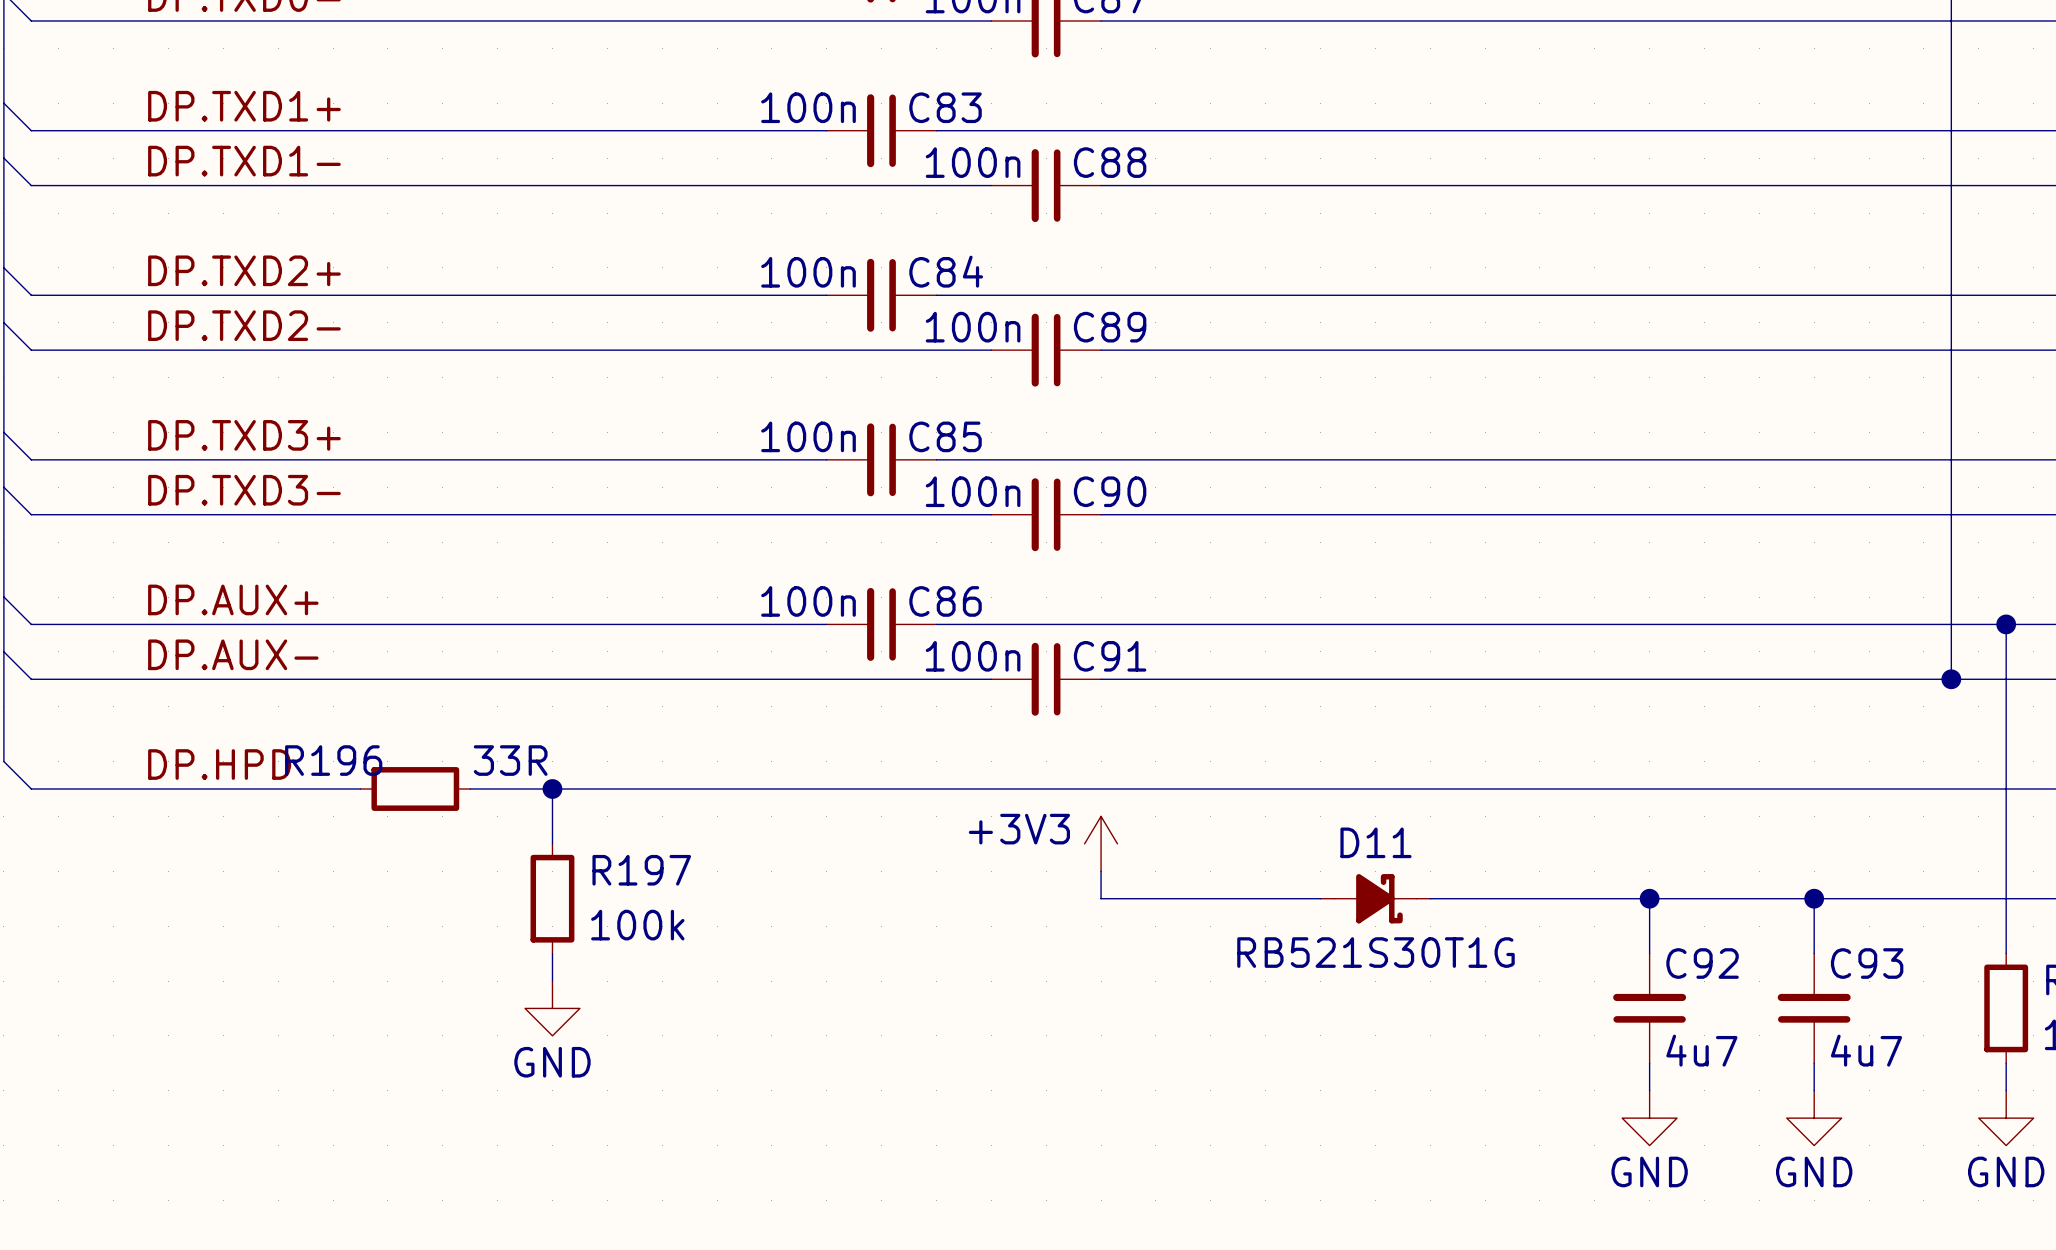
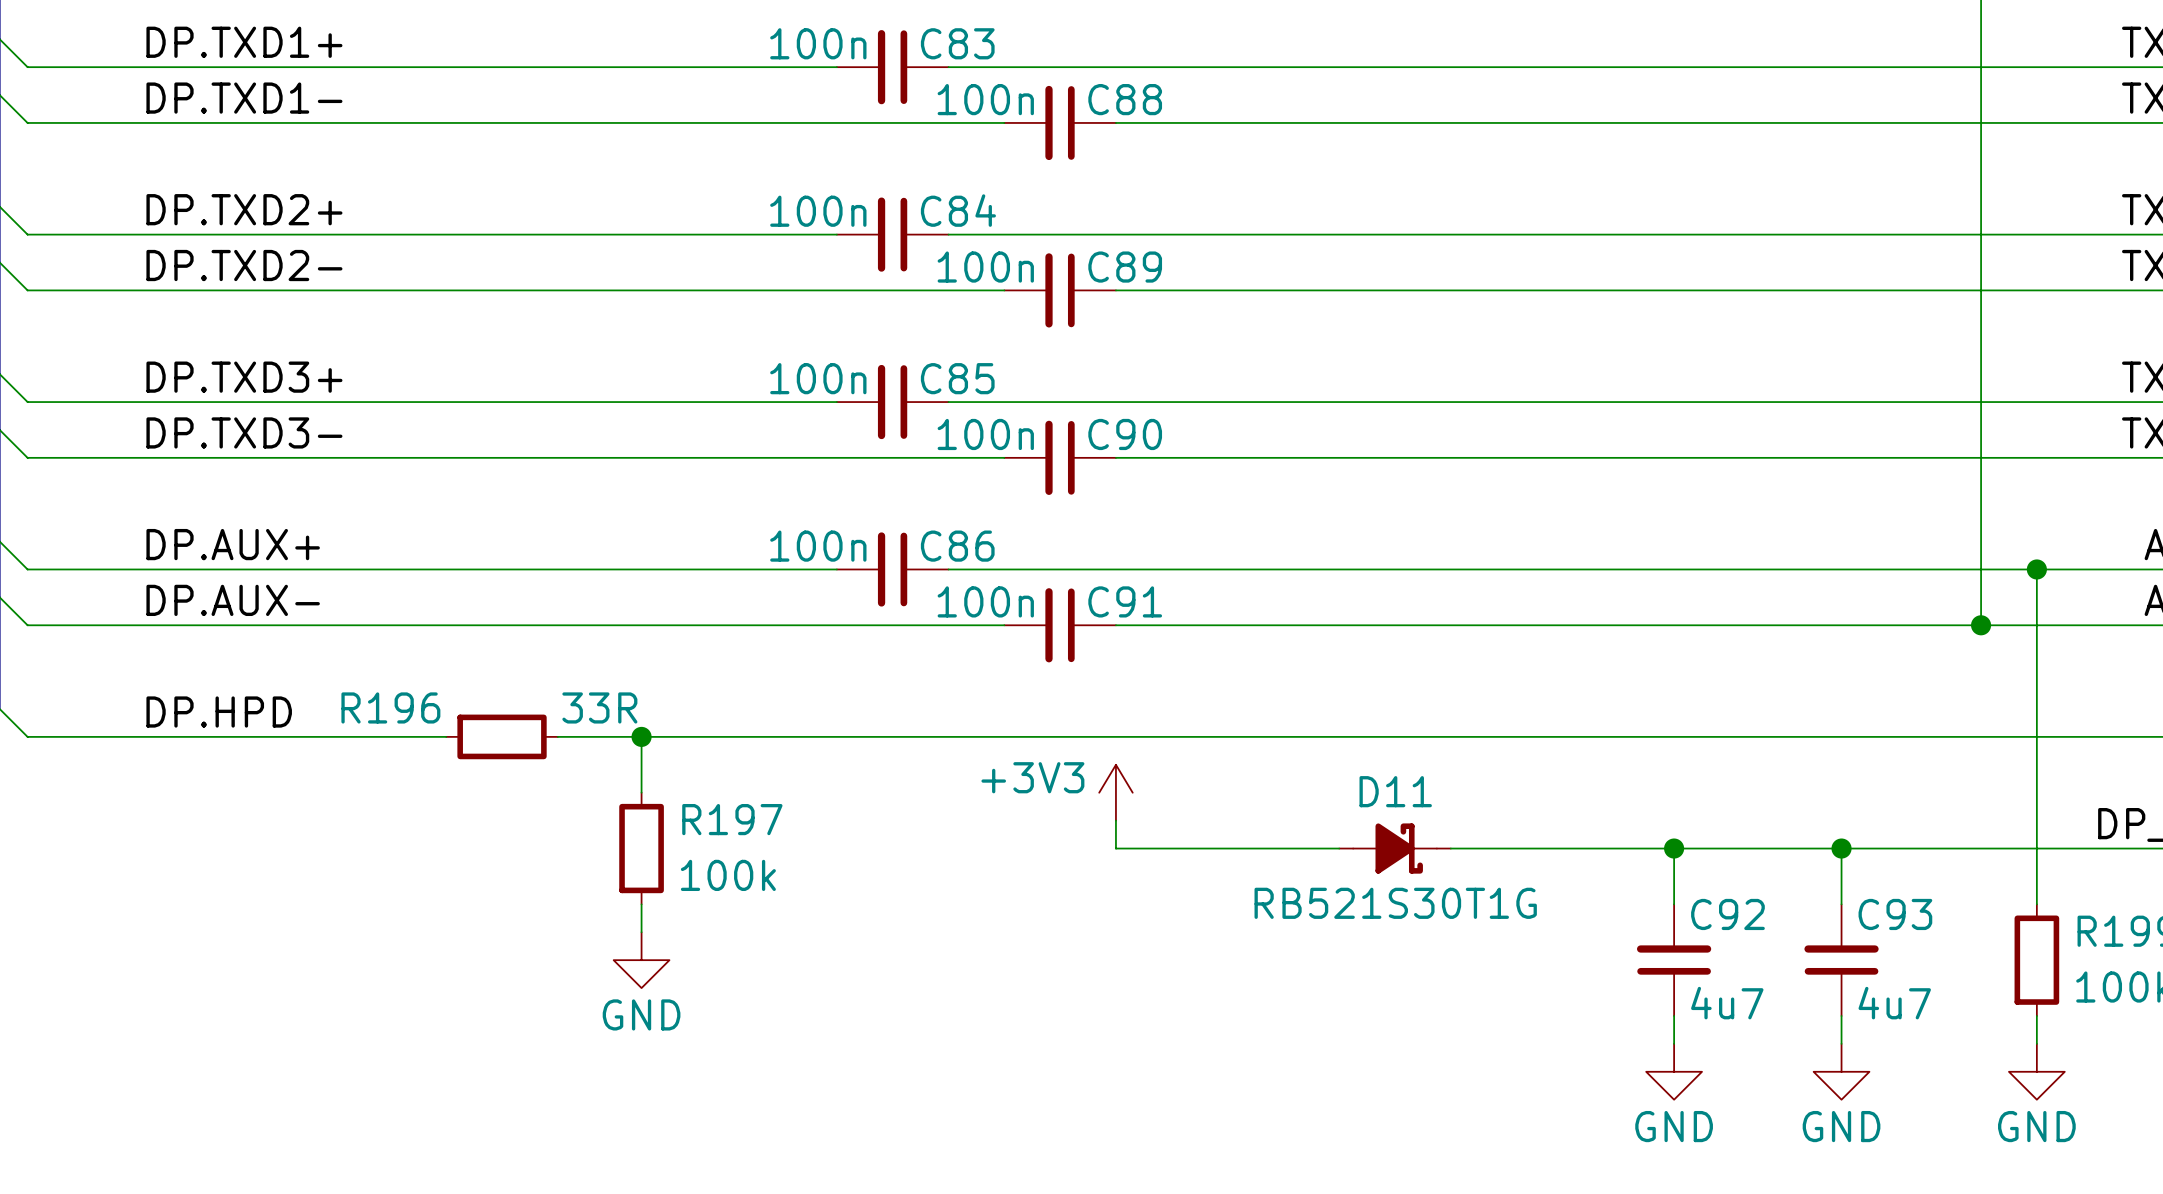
R196 name position: R196 (333, 760) -> R196 (390, 707)
R196 text position: 33R (510, 760) -> 33R (599, 707)
wire: none -> (362, 736) (446, 736)
R196 position: (415, 789) -> (502, 736)
wire: (470, 789) (552, 789) (552, 843) -> none
junction position: (552, 789) -> (641, 736)
wire: none -> (641, 736) (641, 792)
R197 position: (552, 898) -> (641, 848)
wire: (552, 953) (552, 981) -> (641, 904) (641, 932)
power symbol position: GND (552, 1008) -> GND (641, 960)

